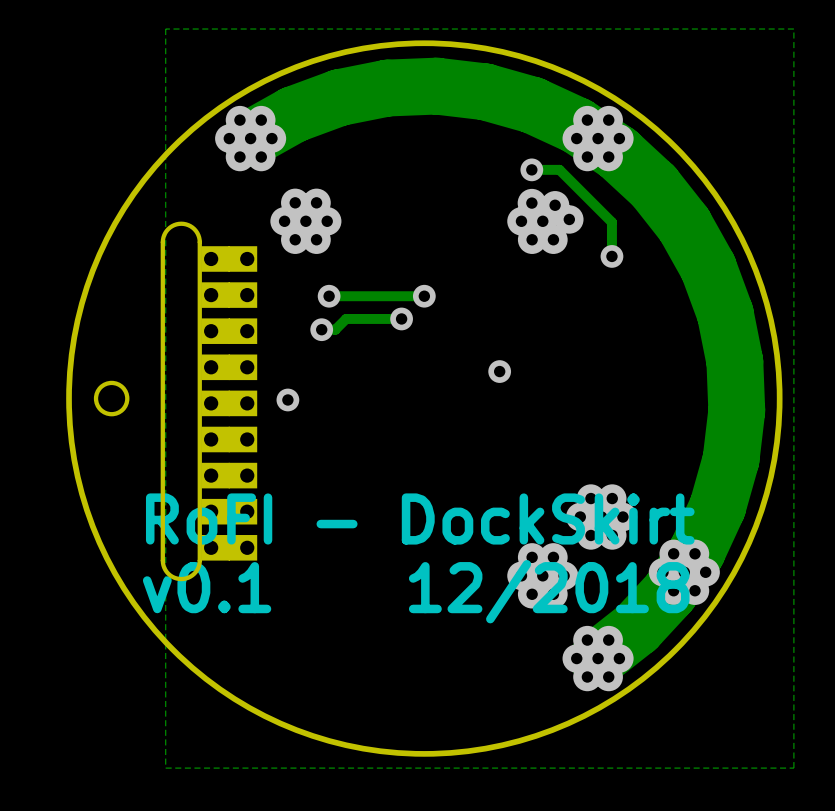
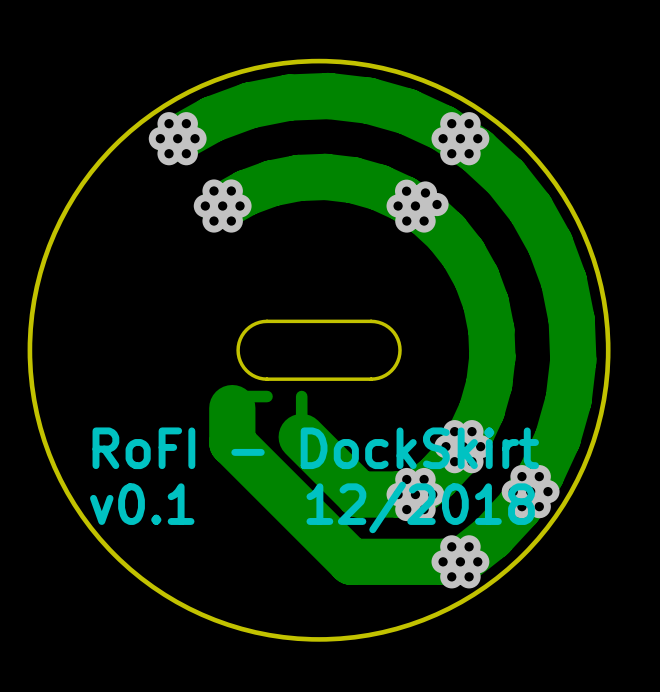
zone outline: (793, 29) (165, 29) (165, 768) (793, 768) (793, 29) -> none
track: (531, 169) (559, 169) (611, 222) (611, 256) -> none
via: (531, 169) -> none
track: none -> (222, 206) (246, 192) (271, 183) (298, 177) (325, 176) (352, 180) (379, 187) (403, 198) (426, 214) (446, 232) (463, 253) (476, 277) (486, 303) (491, 329) (492, 357) (489, 384) (481, 410) (470, 435) (455, 457) (436, 477) (415, 494) (359, 494) (301, 437) (301, 396)
board edge: (199, 242) (199, 560) (194, 573) (181, 579) (168, 573) (162, 560) (162, 242) (168, 229) (181, 223) (194, 229) (199, 242) -> none
via: (611, 256) -> none
via: (329, 296) -> none
track: (424, 296) (329, 296) -> none
via: (424, 296) -> none
track: (401, 318) (346, 318) (335, 329) (321, 329) -> none
via: (401, 318) -> none
via: (321, 329) -> none
board edge: none -> (371, 321) (259, 322) (249, 327) (241, 335) (238, 346) (239, 357) (246, 370) (263, 378) (378, 378) (394, 367) (399, 357) (399, 346) (391, 329) (382, 323) (371, 321)
via: (499, 371) -> none
round board edge: [93, 380, 130, 417] -> none
via: (287, 399) -> none
part: (229, 403) -> none
track: none -> (267, 396) (241, 396) (232, 405) (232, 442) (351, 561) (460, 561)

